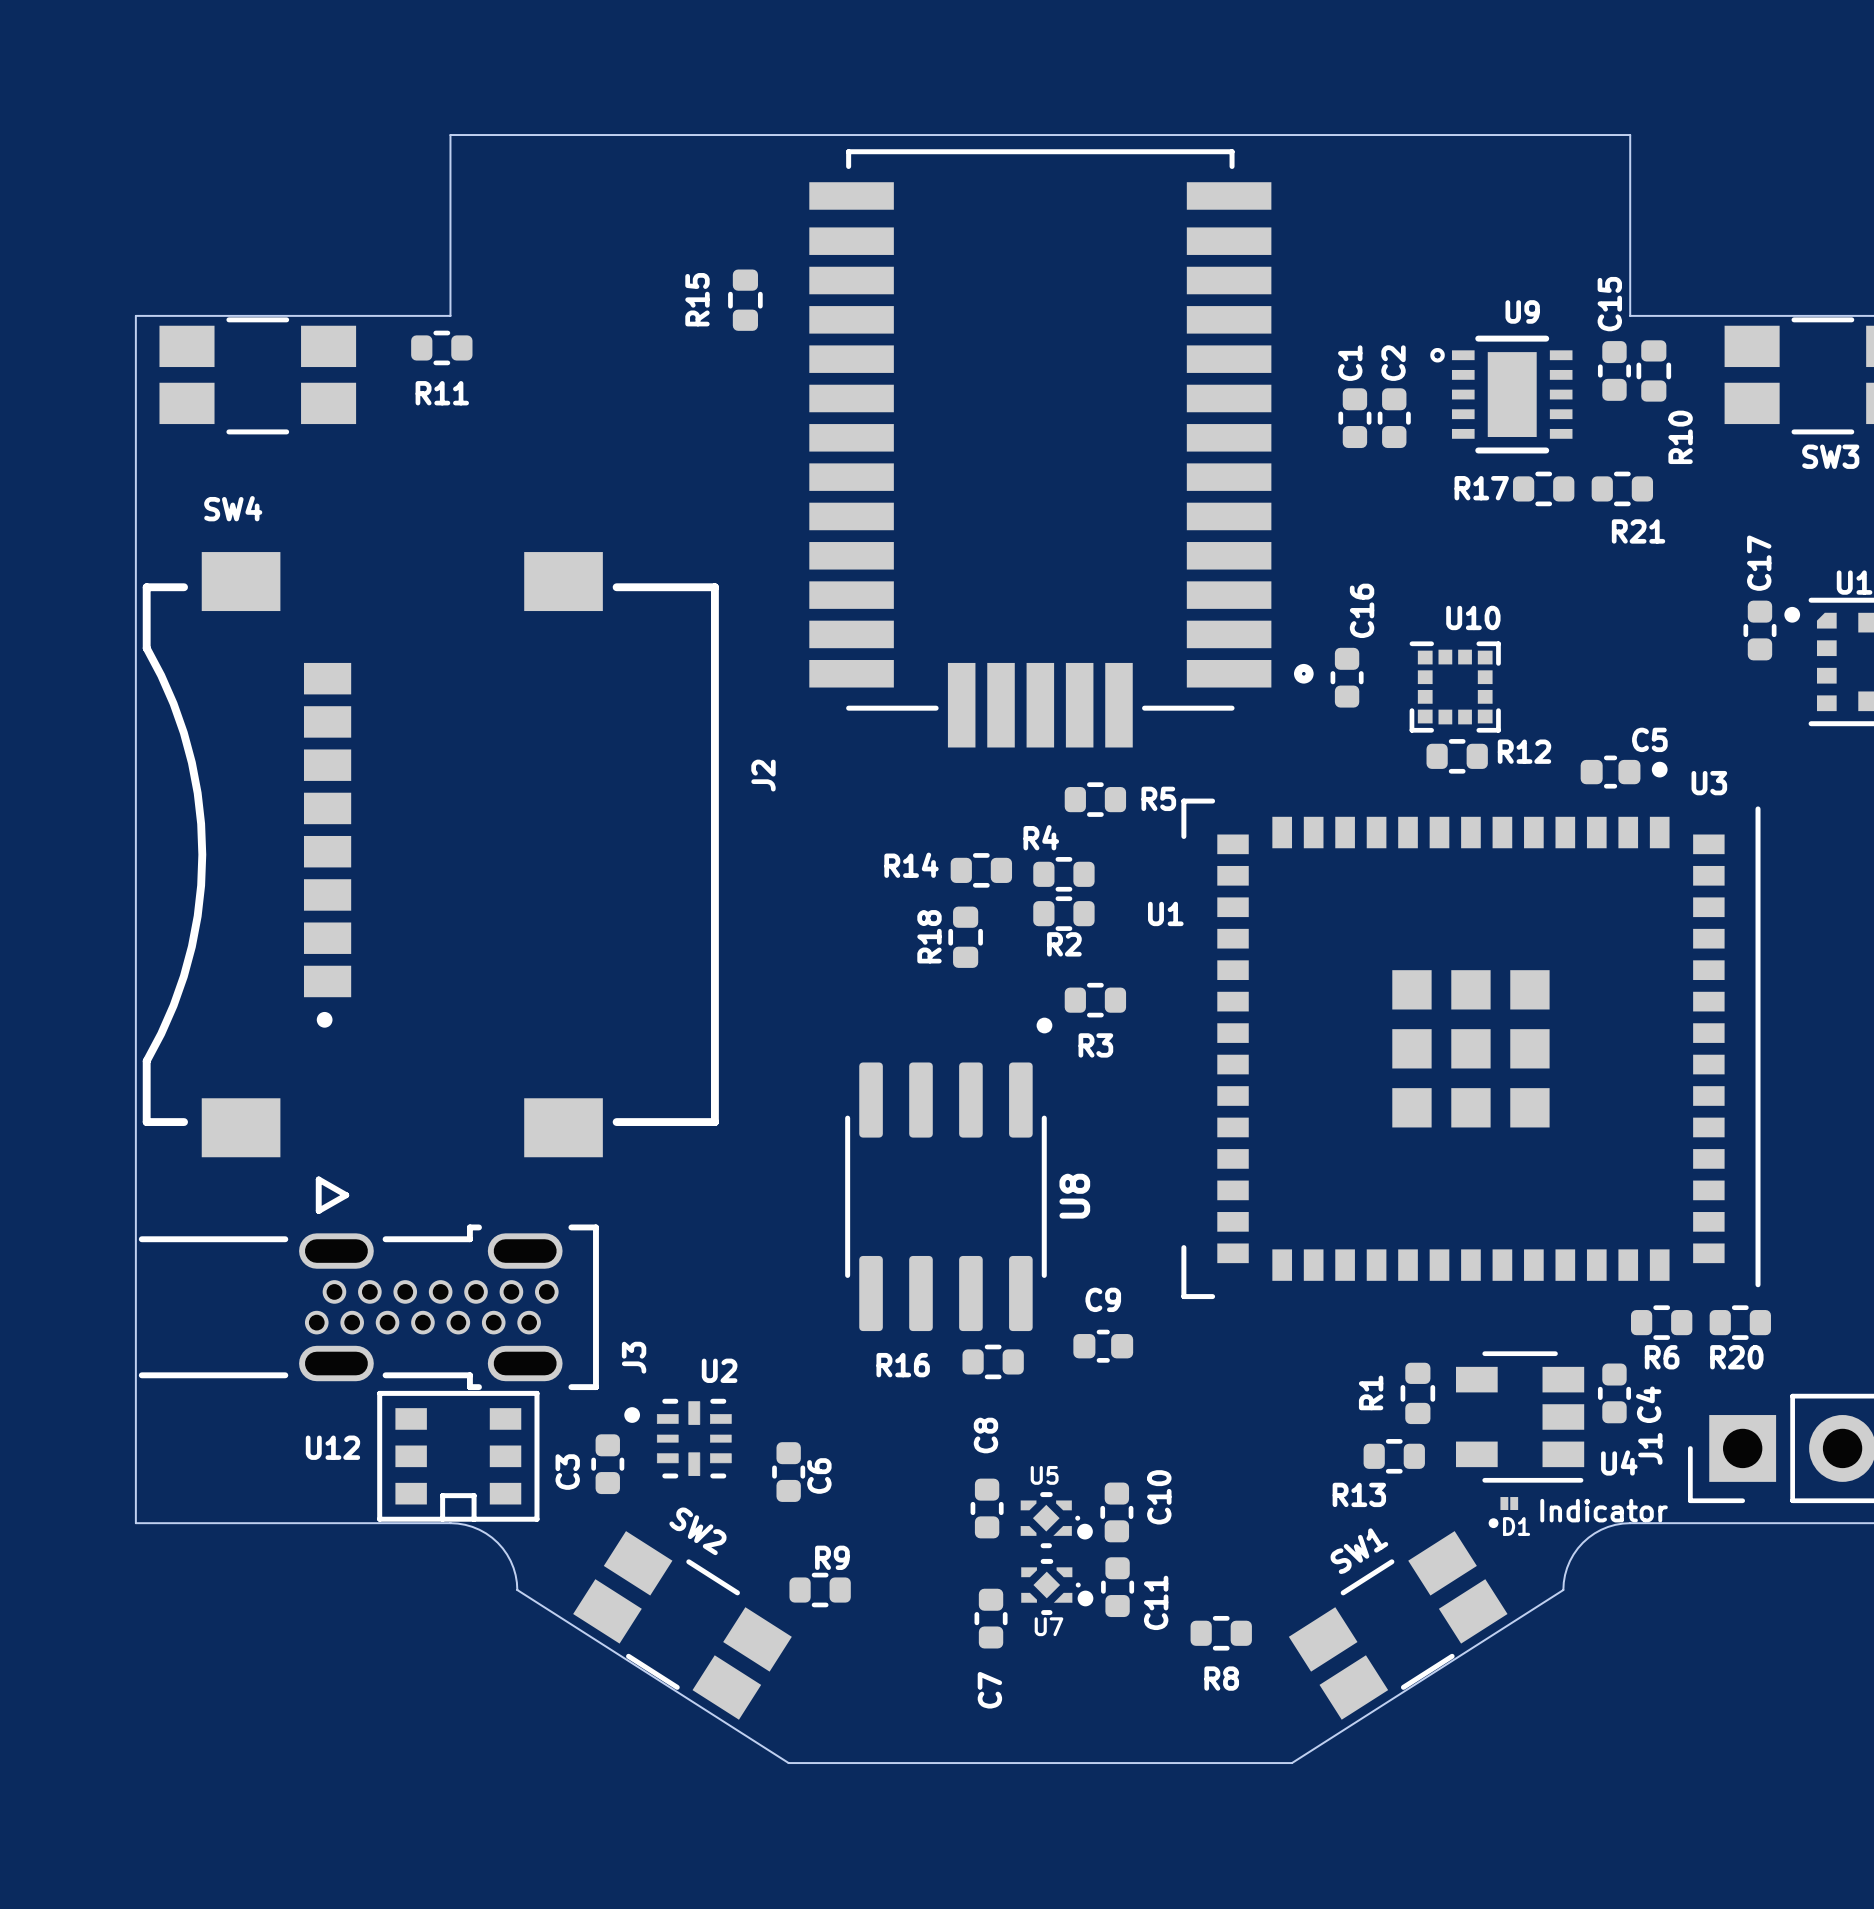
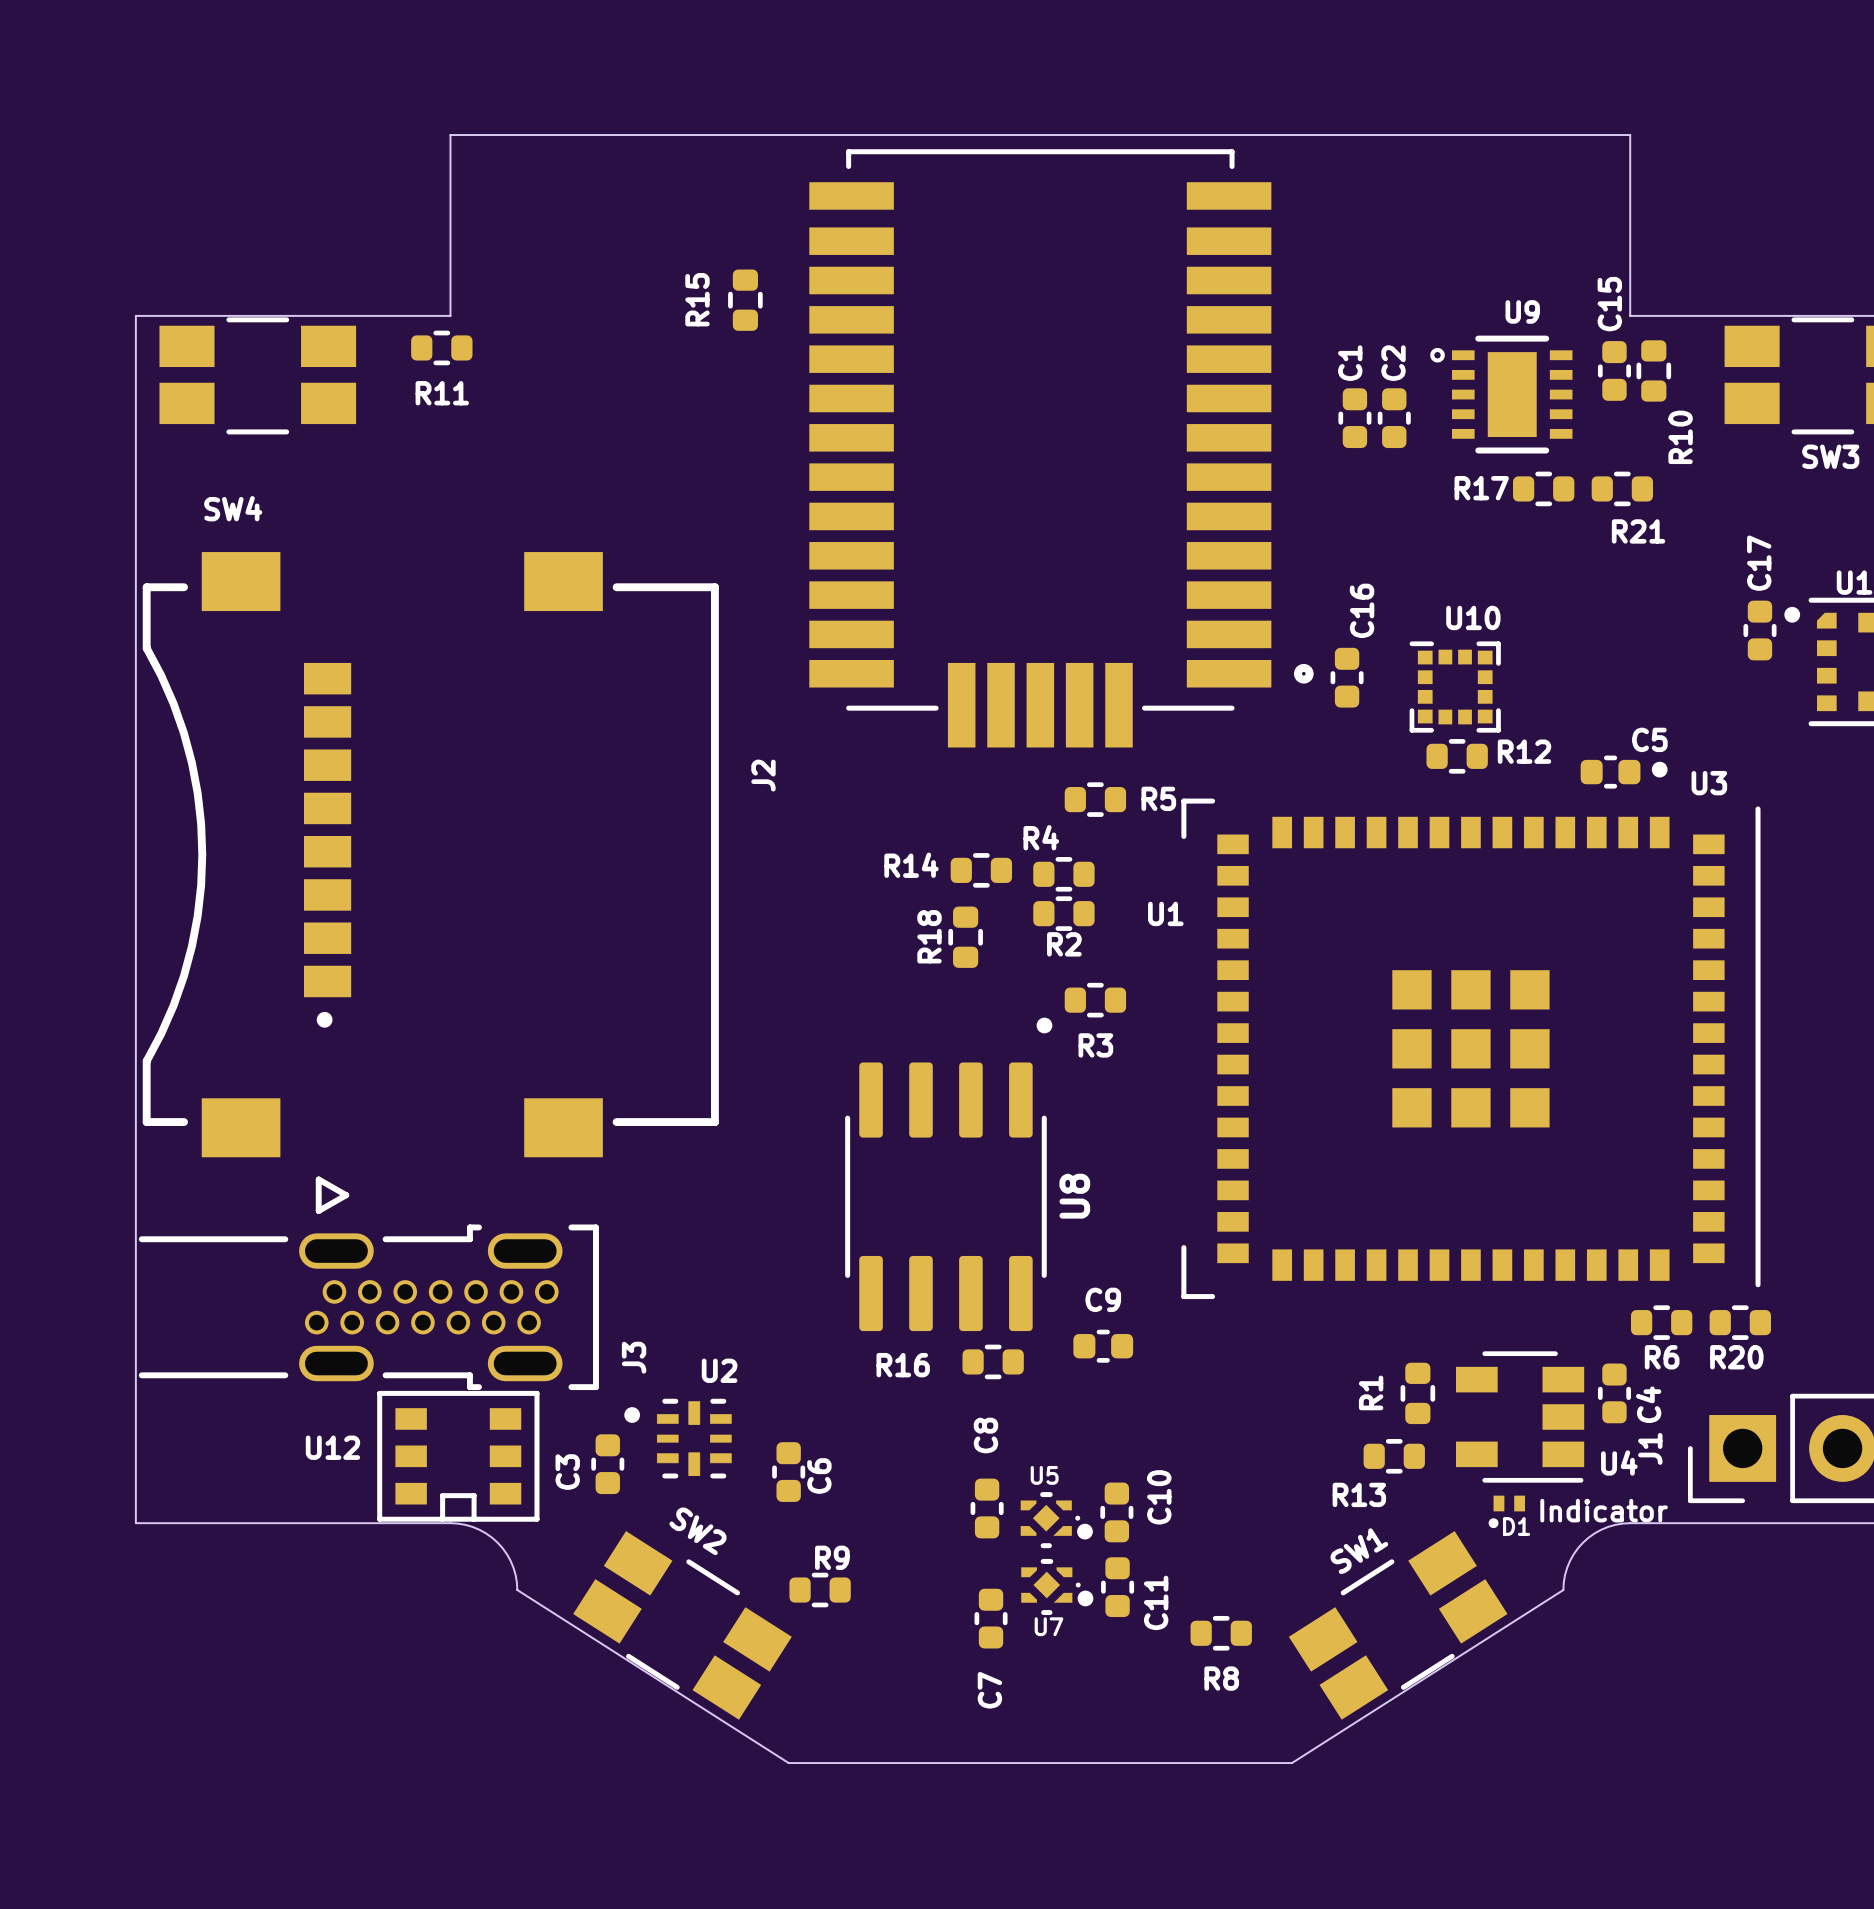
D1 footprint: [1488, 1497, 1519, 1529] -> [1488, 1495, 1526, 1529]

